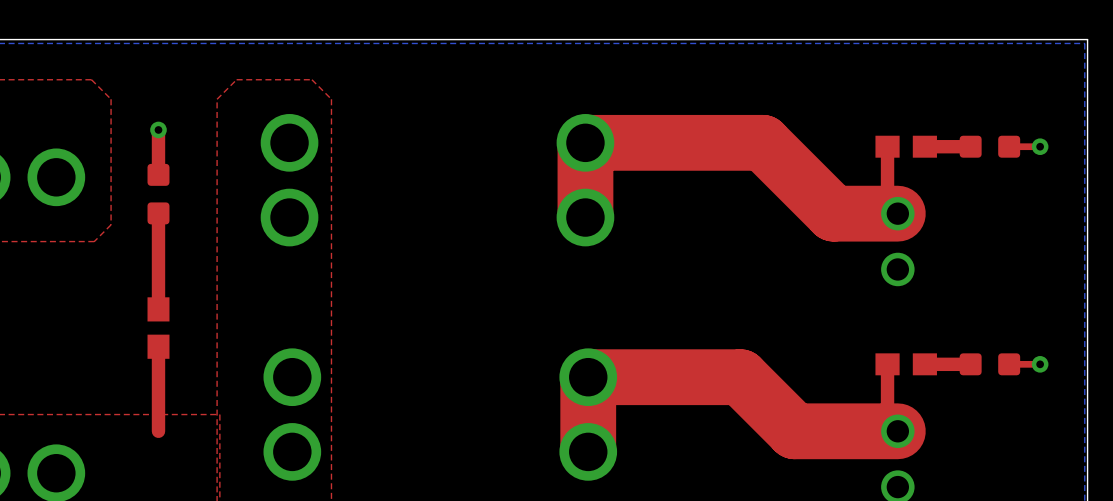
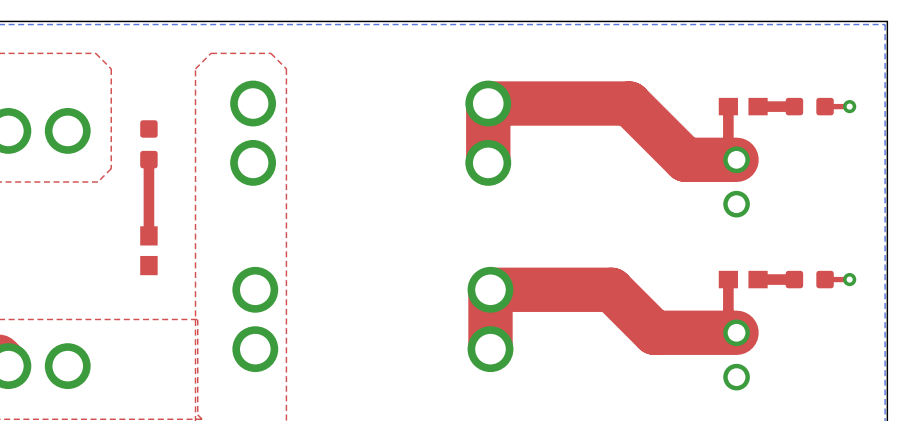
top track: (158, 129) (158, 174) -> none
via: (158, 129) -> none
top track: (158, 346) (158, 431) -> none

